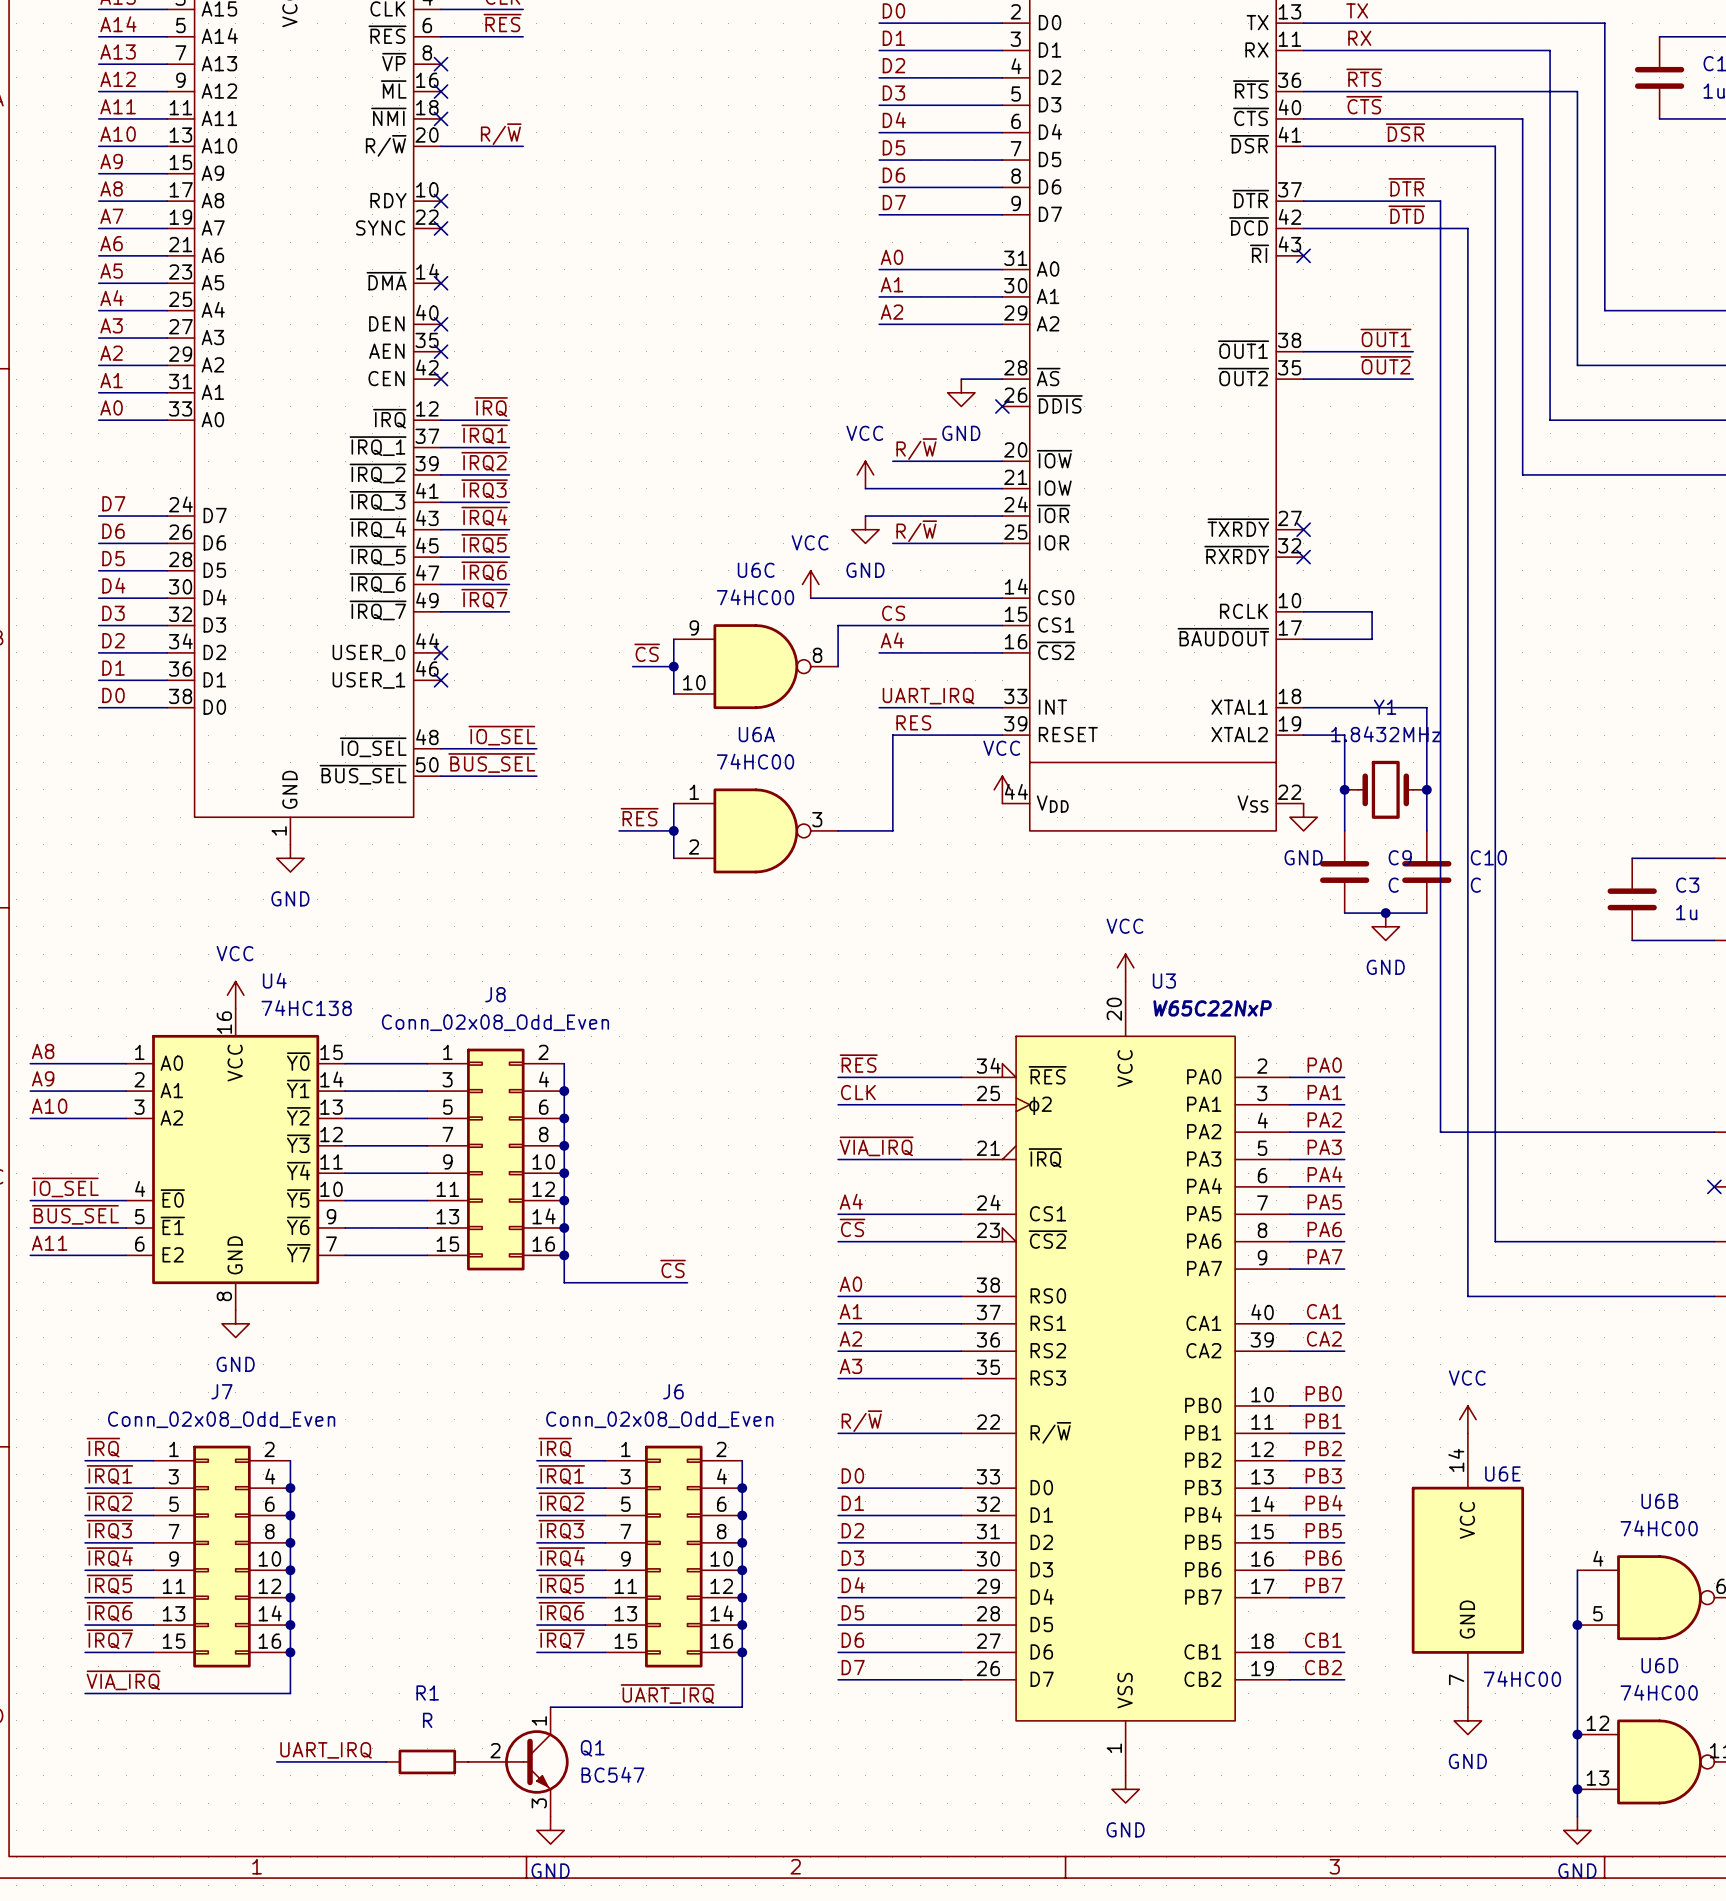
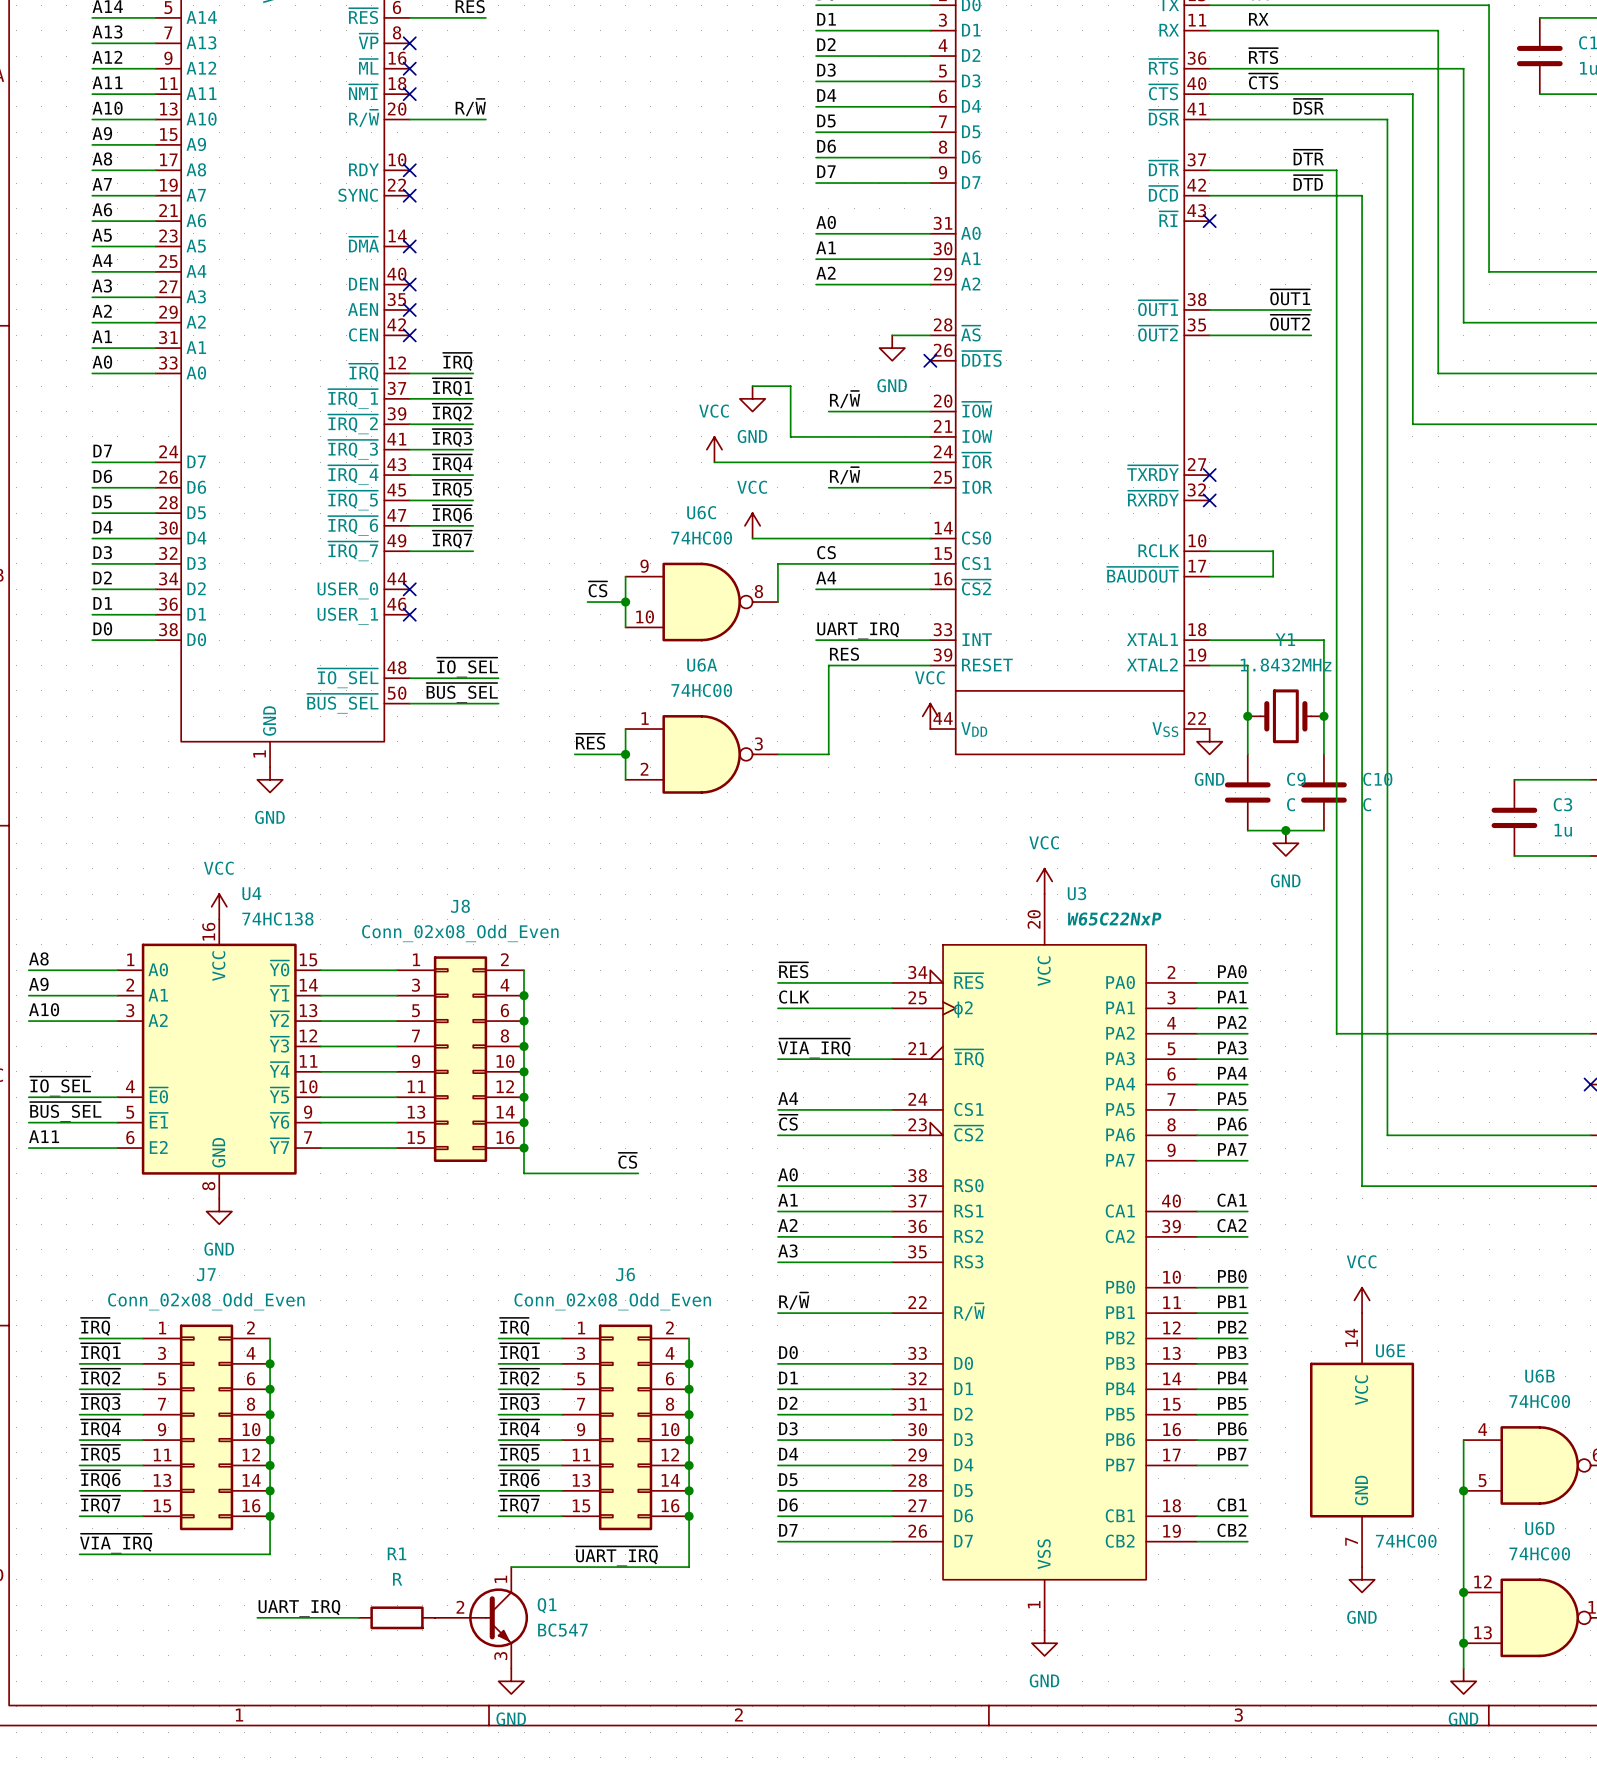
wire: none -> (752, 386) (790, 386) (790, 436) (803, 436)
power symbol position: VCC (865, 474) -> VCC (714, 449)
wire: none -> (714, 462) (803, 462)
power symbol position: GND (865, 529) -> GND (752, 398)

